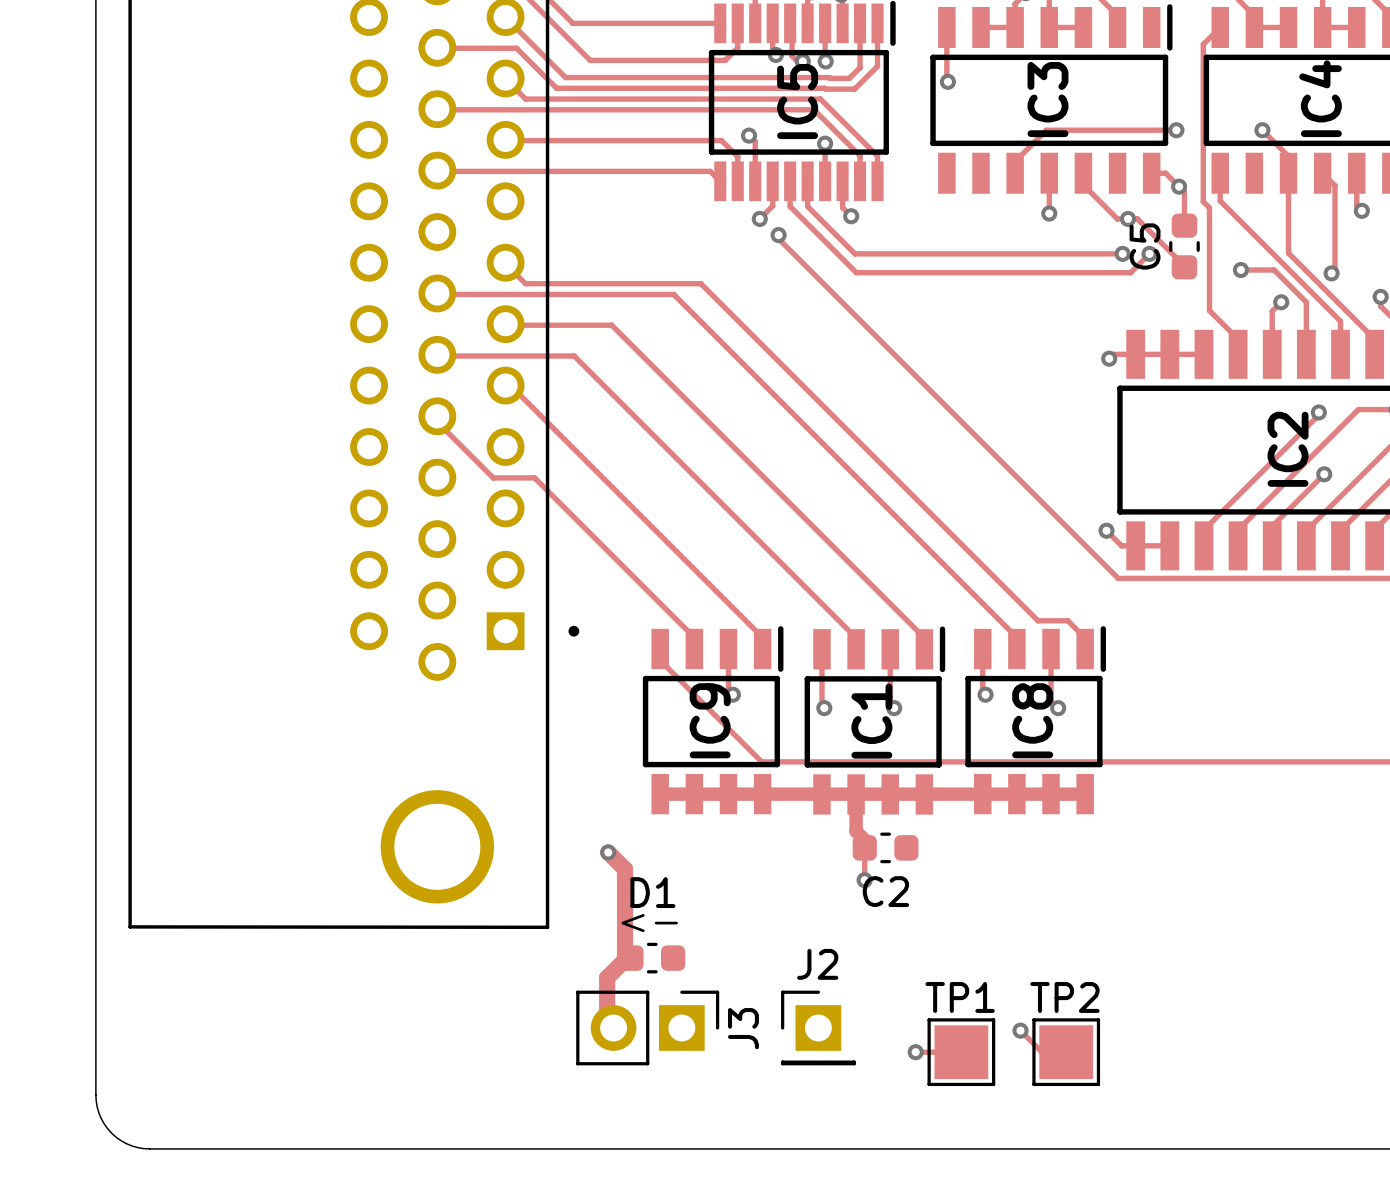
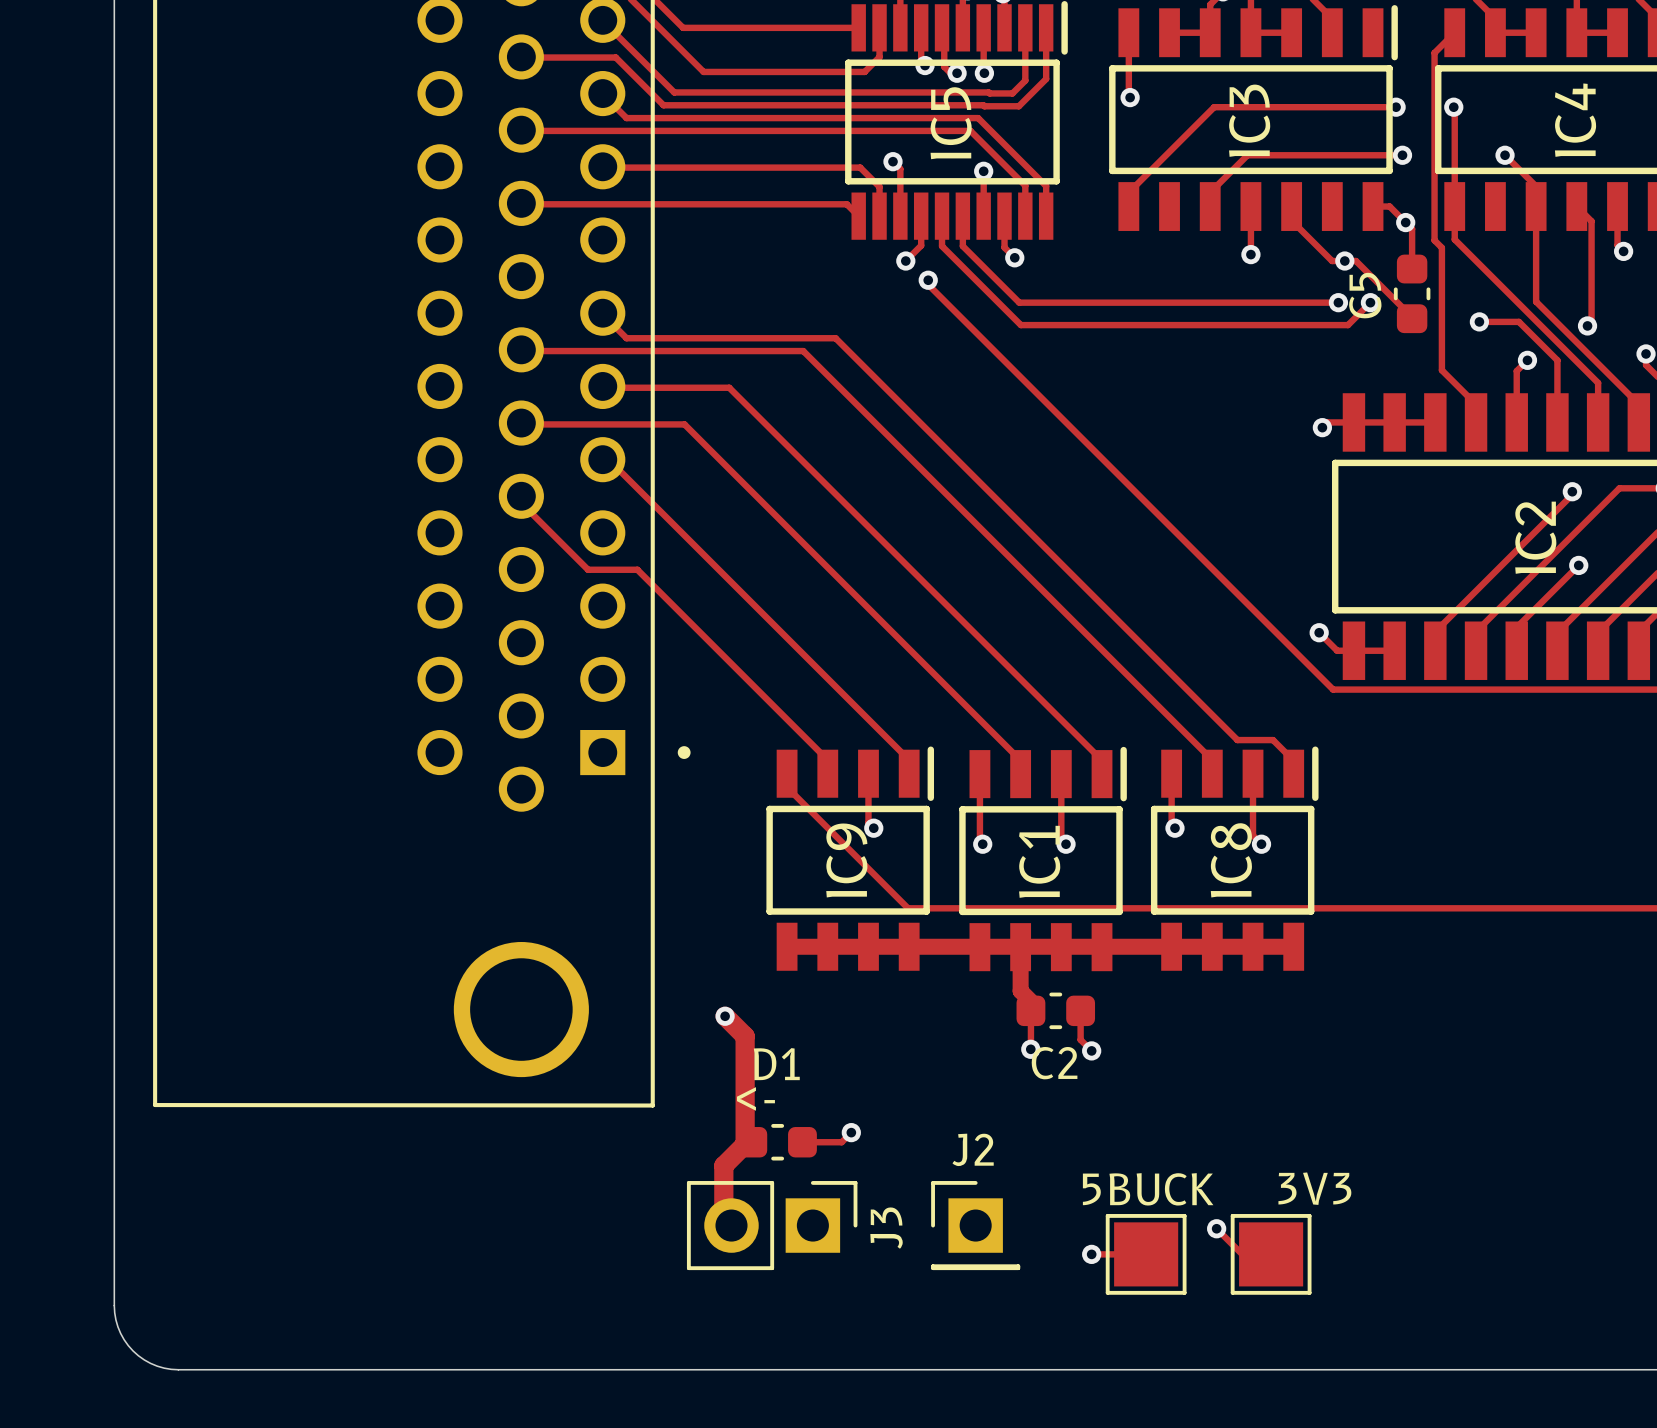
track: none -> (1396, 107) (1214, 107) (1128, 192) (1128, 206)
via: none -> (1396, 107)
track: none -> (1453, 107) (1454, 206)
via: none -> (1453, 107)
track: none -> (1080, 1010) (1080, 1039) (1091, 1050)
via: none -> (1091, 1050)
track: none -> (851, 1132) (841, 1142) (802, 1142)
via: none -> (851, 1132)
TP1 name: TP1 (960, 997) -> 5BUCK (1148, 1189)
TP2 name: TP2 (1064, 997) -> 3V3 (1314, 1188)

